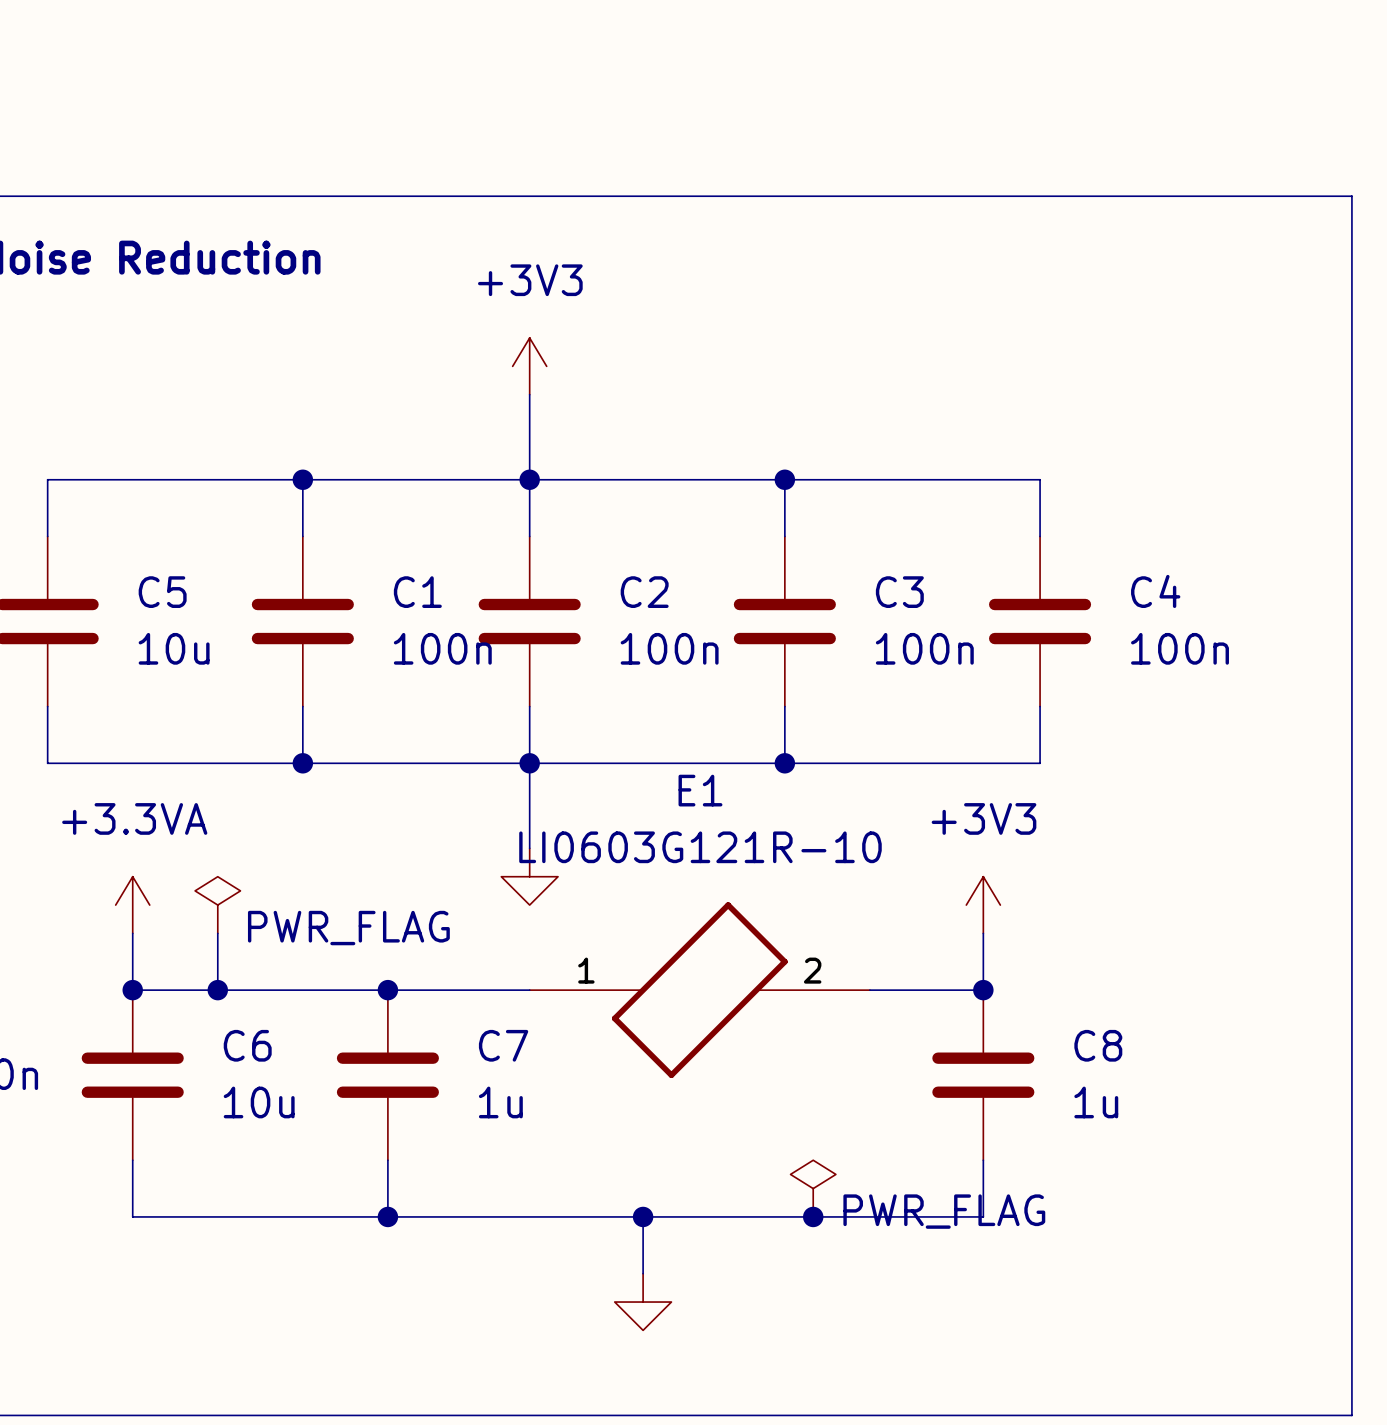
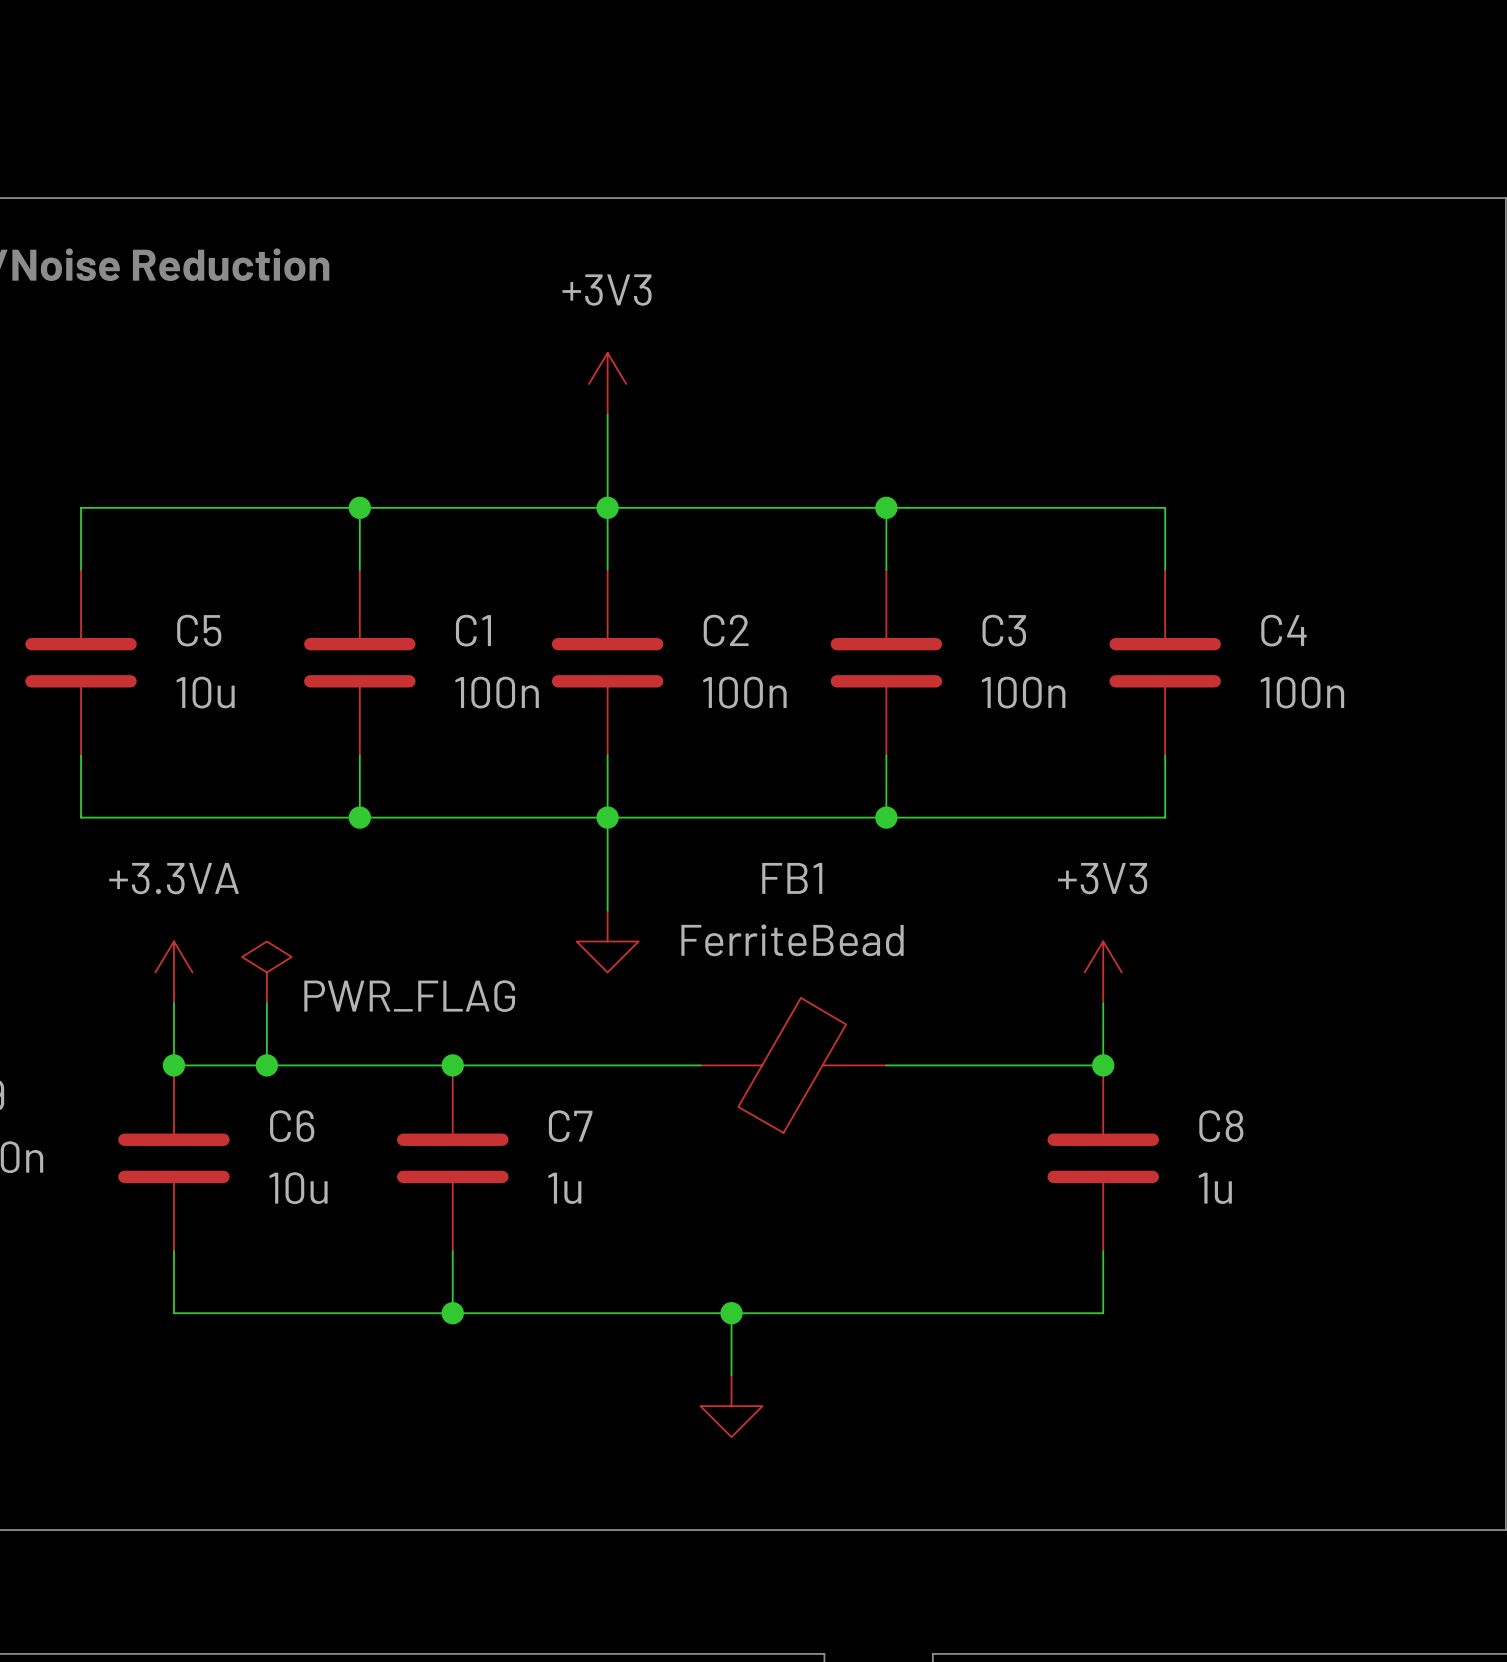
E1: LI0603G121R-10 (699, 990) -> none
FB1: none -> FerriteBead (793, 1065)
power symbol: PWR_FLAG (813, 1188) -> none
junction: (813, 1216) -> none

